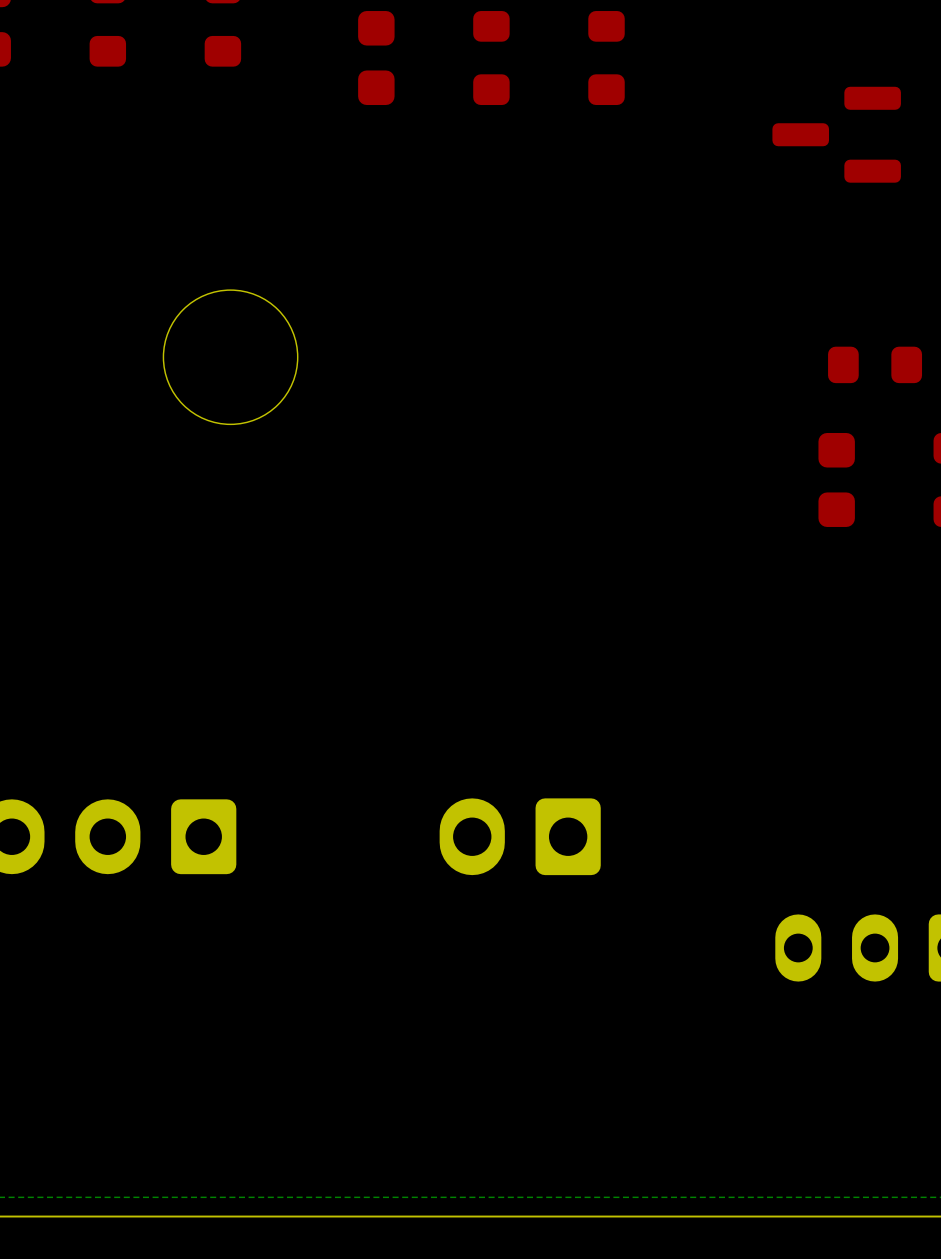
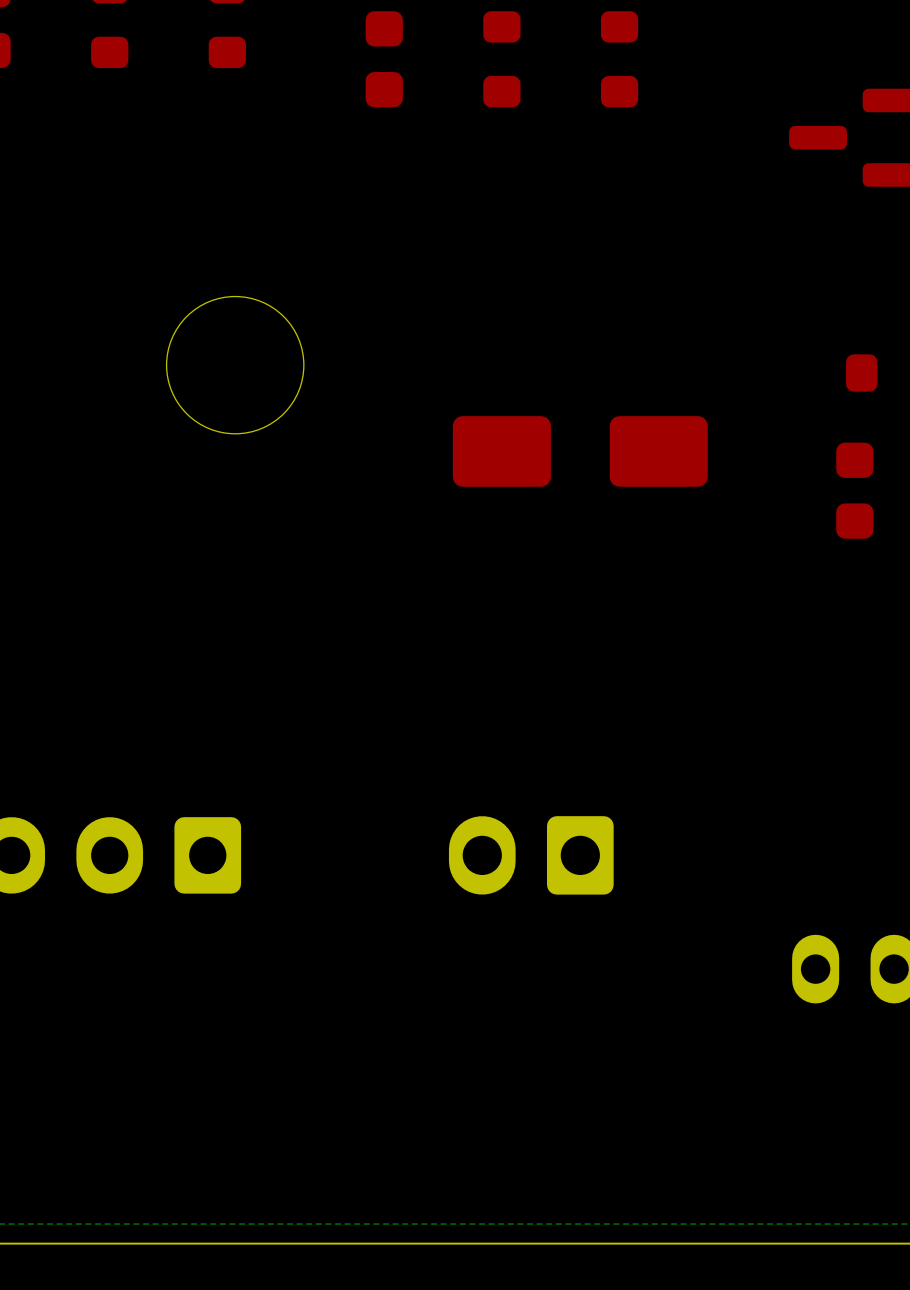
part: none -> (580, 451)

